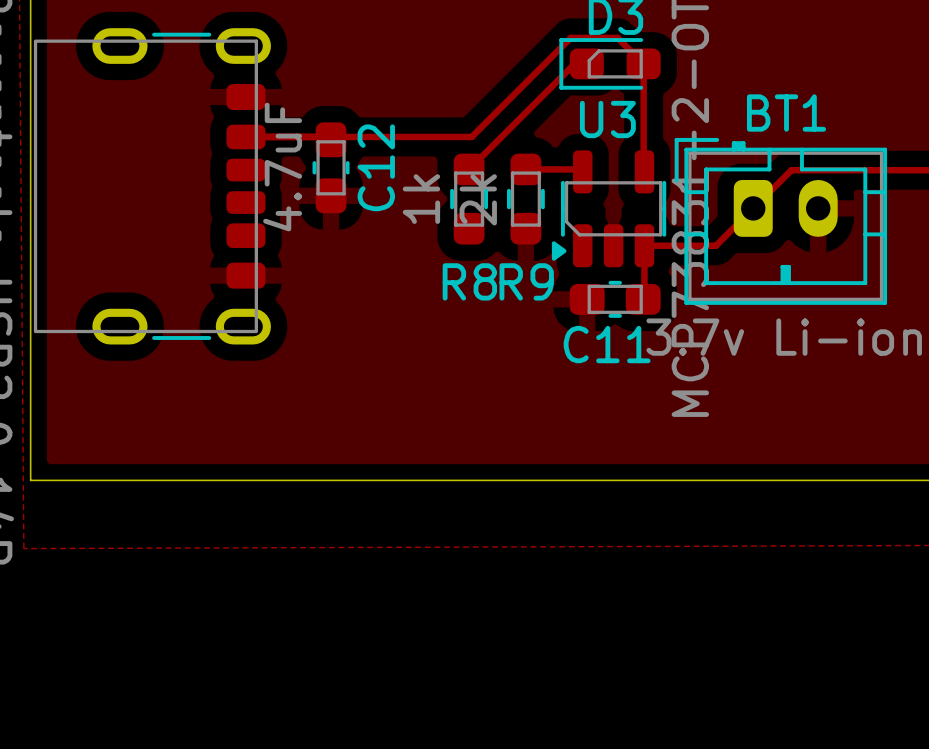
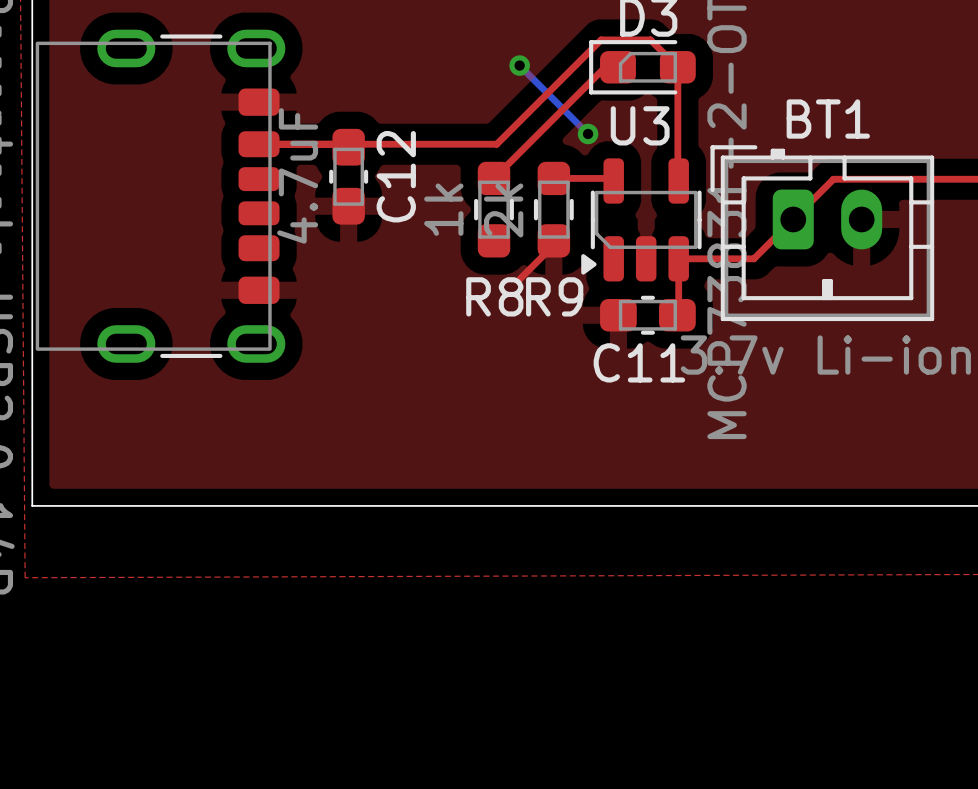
bottom track: none -> (519, 65) (588, 133)
via: none -> (519, 65)
via: none -> (588, 133)
top track: none -> (553, 240) (553, 245) (519, 279)

